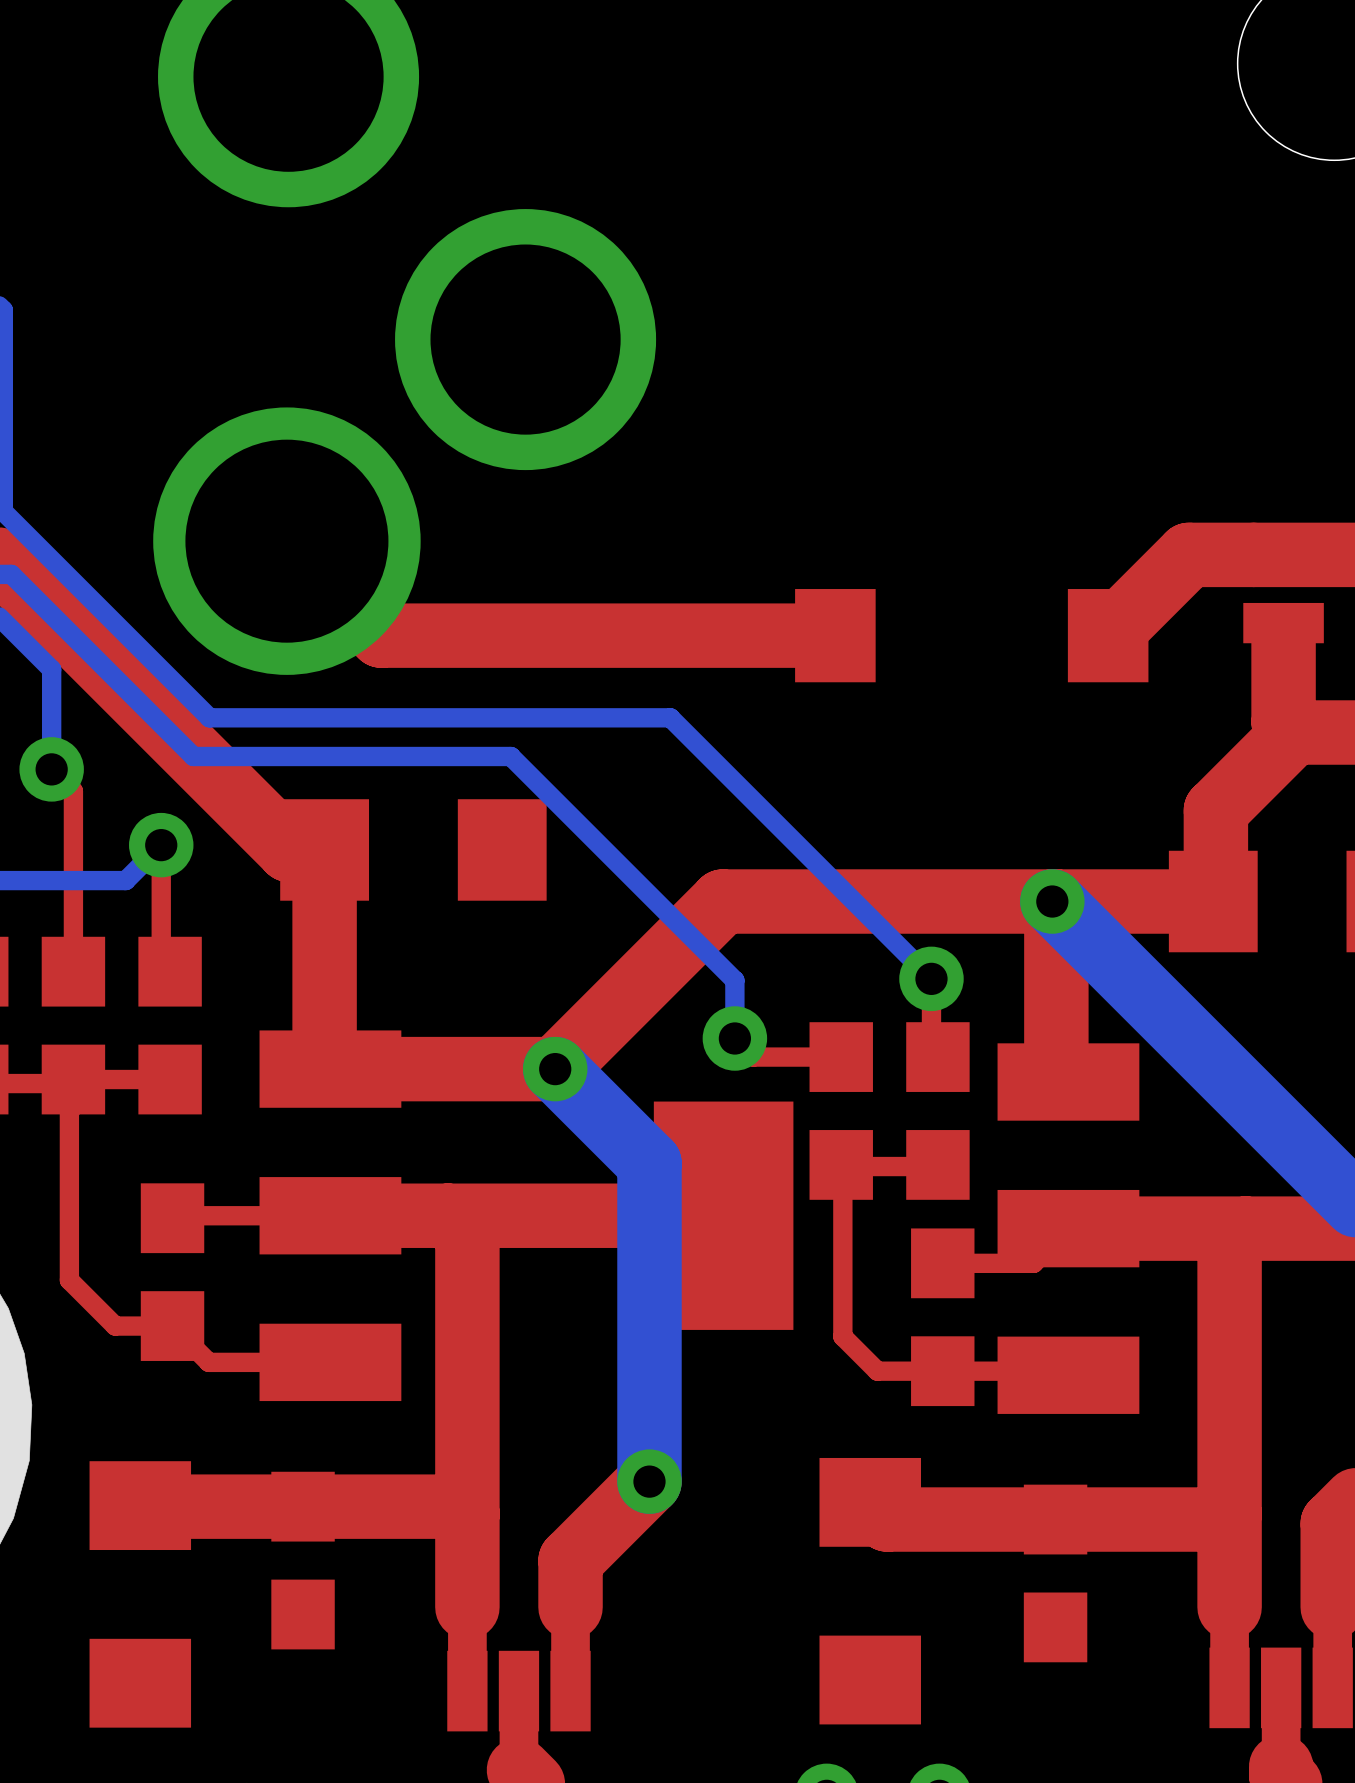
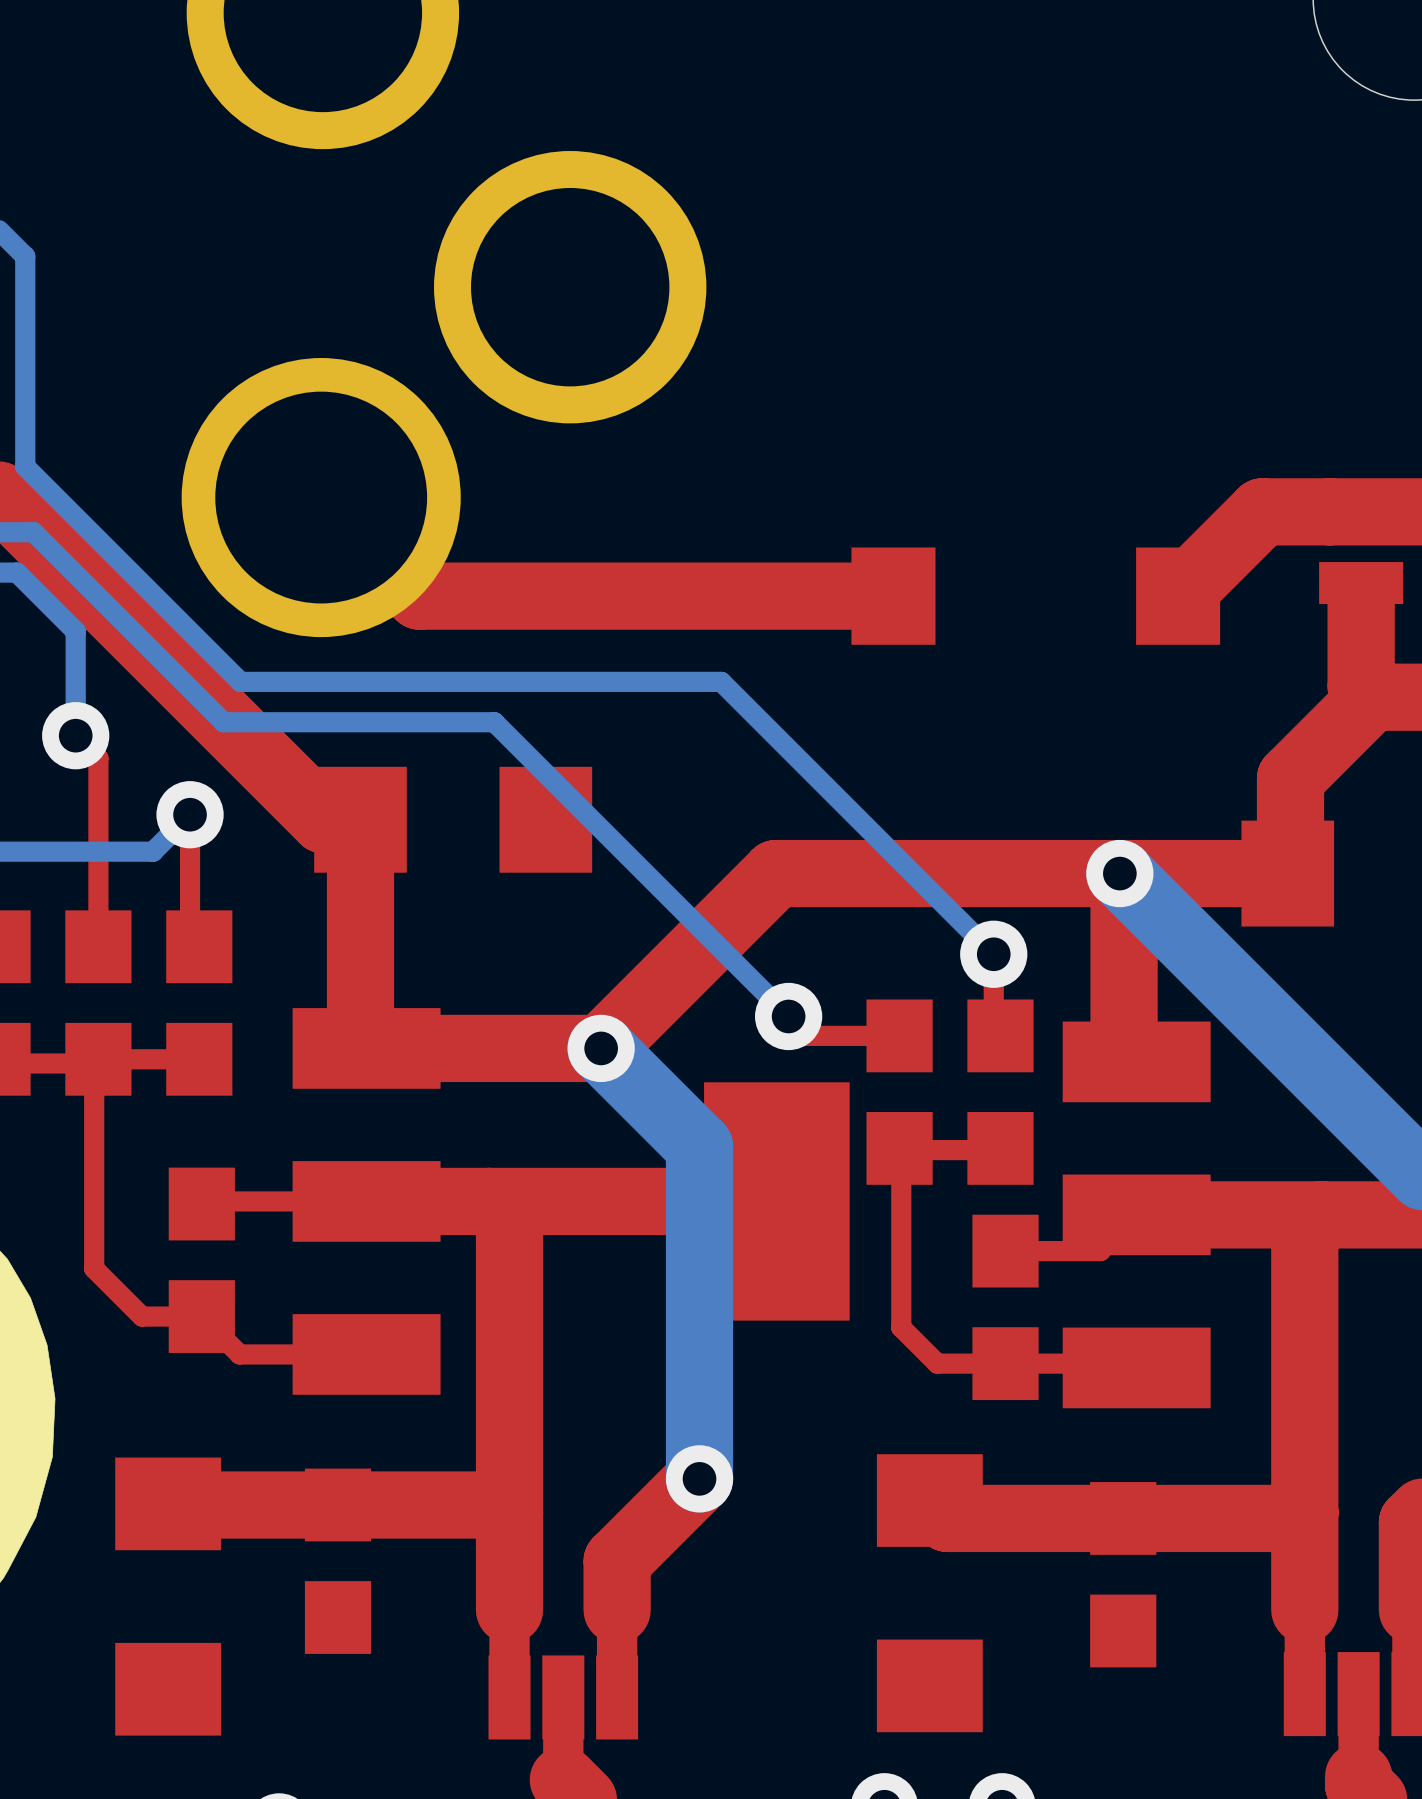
bottom track: (452, 756) (510, 756) (734, 980) (734, 1038) -> (494, 722) (788, 1016)

